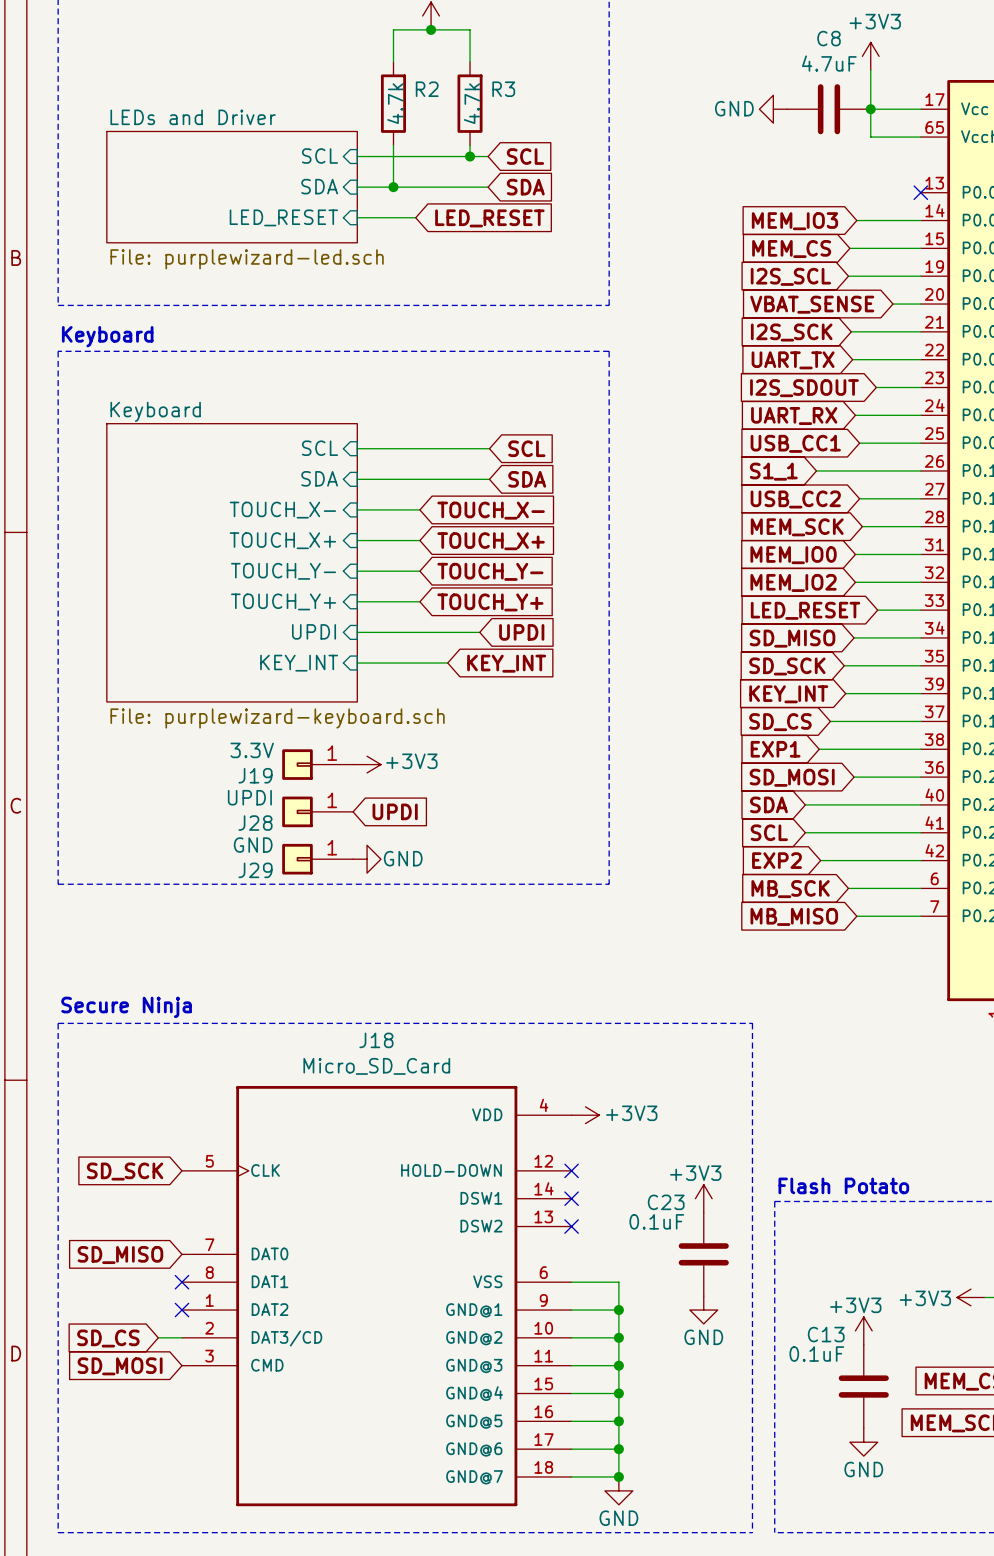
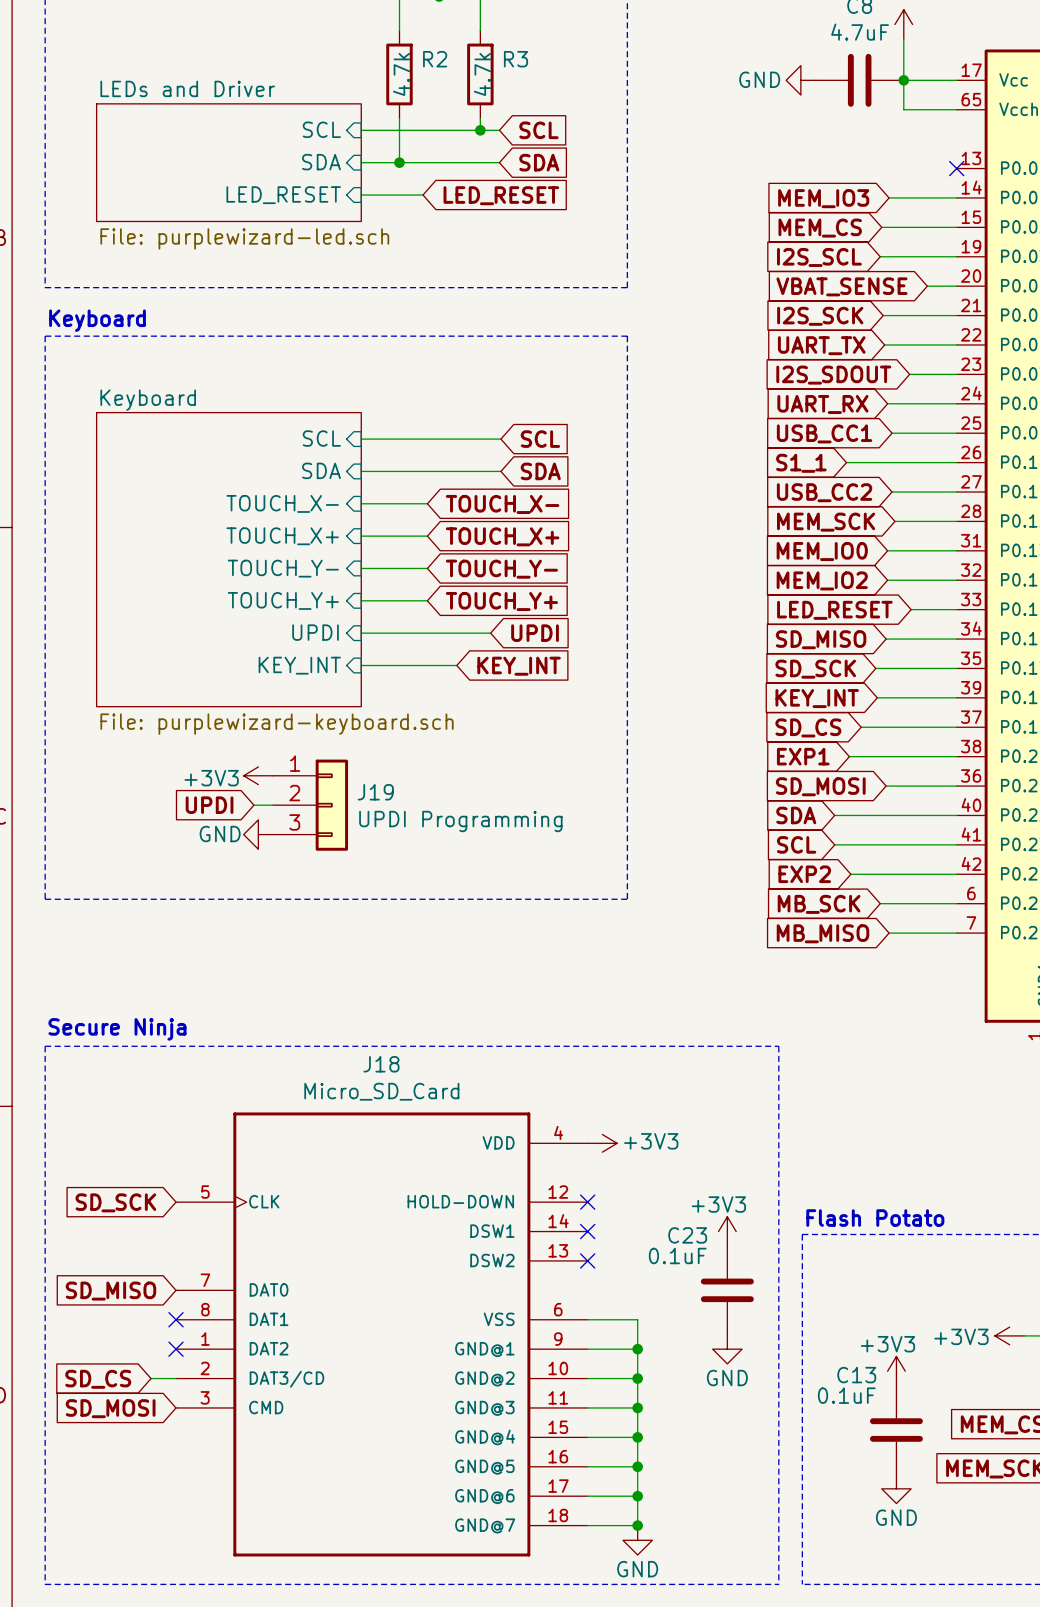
J19 symbol: [282, 749, 354, 780] -> [273, 759, 349, 851]
J19 value: 3.3V (252, 750) -> UPDI Programming (460, 821)
power symbol rotation: 0° (367, 764) -> 180° (258, 775)
power symbol position: +3V3 (367, 764) -> +3V3 (258, 775)
J19 name position: J19 (255, 775) -> J19 (375, 792)
wire: none -> (253, 805) (273, 805)
J28: UPDI (317, 811) -> none
global label rotation: 0° (395, 811) -> 180° (209, 805)
global label position: UPDI (395, 811) -> UPDI (209, 805)
J29: GND (317, 859) -> none
power symbol rotation: 0° (367, 859) -> 180° (258, 834)
power symbol position: GND (367, 859) -> GND (258, 834)

